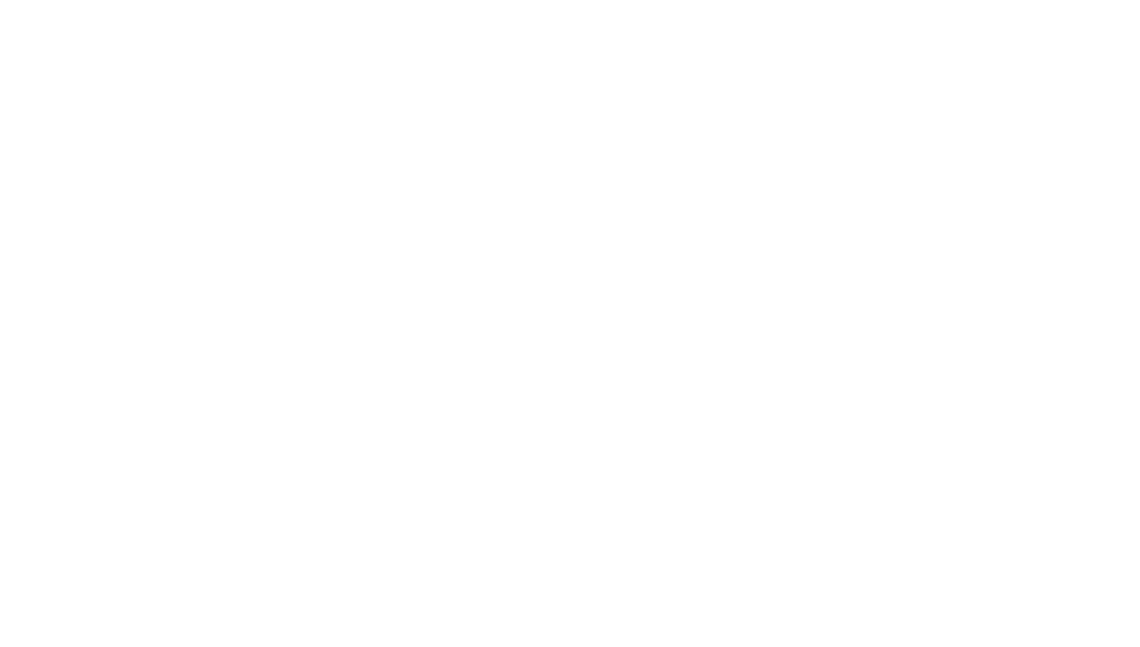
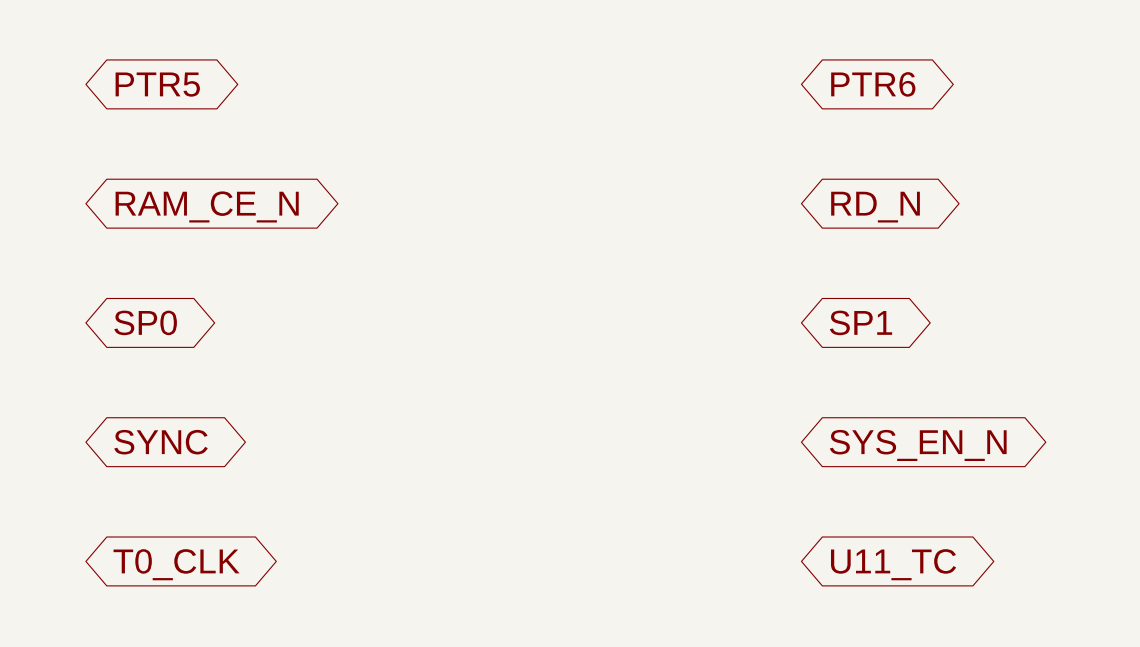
global label: none -> PTR5 (157, 84)
global label: none -> PTR6 (873, 84)
global label: none -> RAM_CE_N (207, 206)
global label: none -> RD_N (875, 207)
global label: none -> SP0 (145, 322)
global label: none -> SP1 (861, 322)
global label: none -> SYNC (161, 442)
global label: none -> SYS_EN_N (918, 445)
global label: none -> T0_CLK (176, 564)
global label: none -> U11_TC (893, 564)

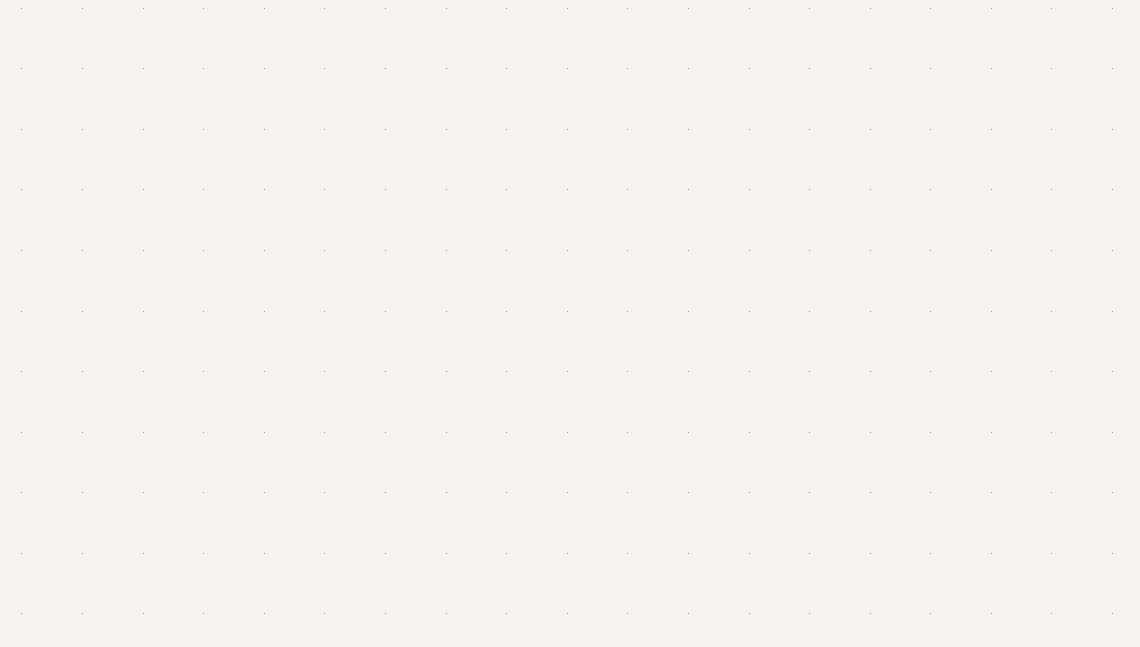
global label: PTR5 (157, 84) -> none
global label: PTR6 (873, 84) -> none
global label: RAM_CE_N (207, 206) -> none
global label: RD_N (875, 207) -> none
global label: SP0 (145, 322) -> none
global label: SP1 (861, 322) -> none
global label: SYNC (161, 442) -> none
global label: SYS_EN_N (918, 445) -> none
global label: T0_CLK (176, 564) -> none
global label: U11_TC (893, 564) -> none

